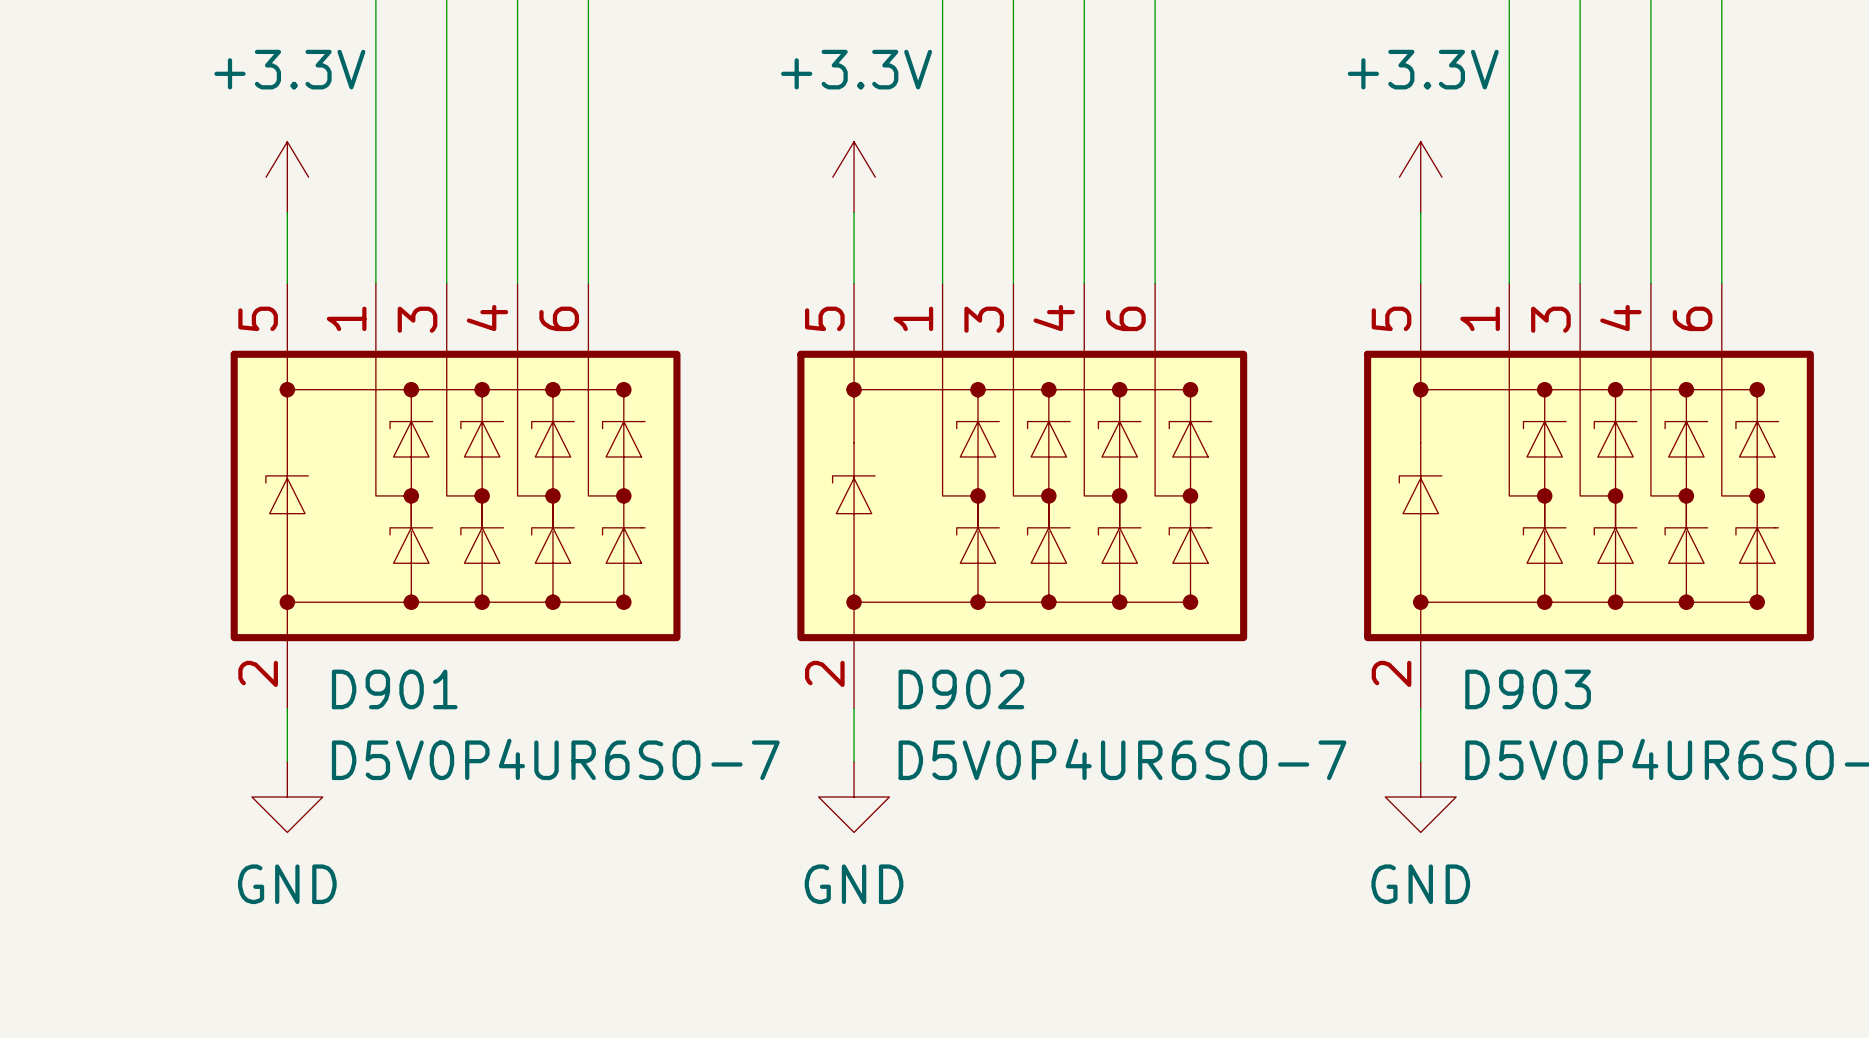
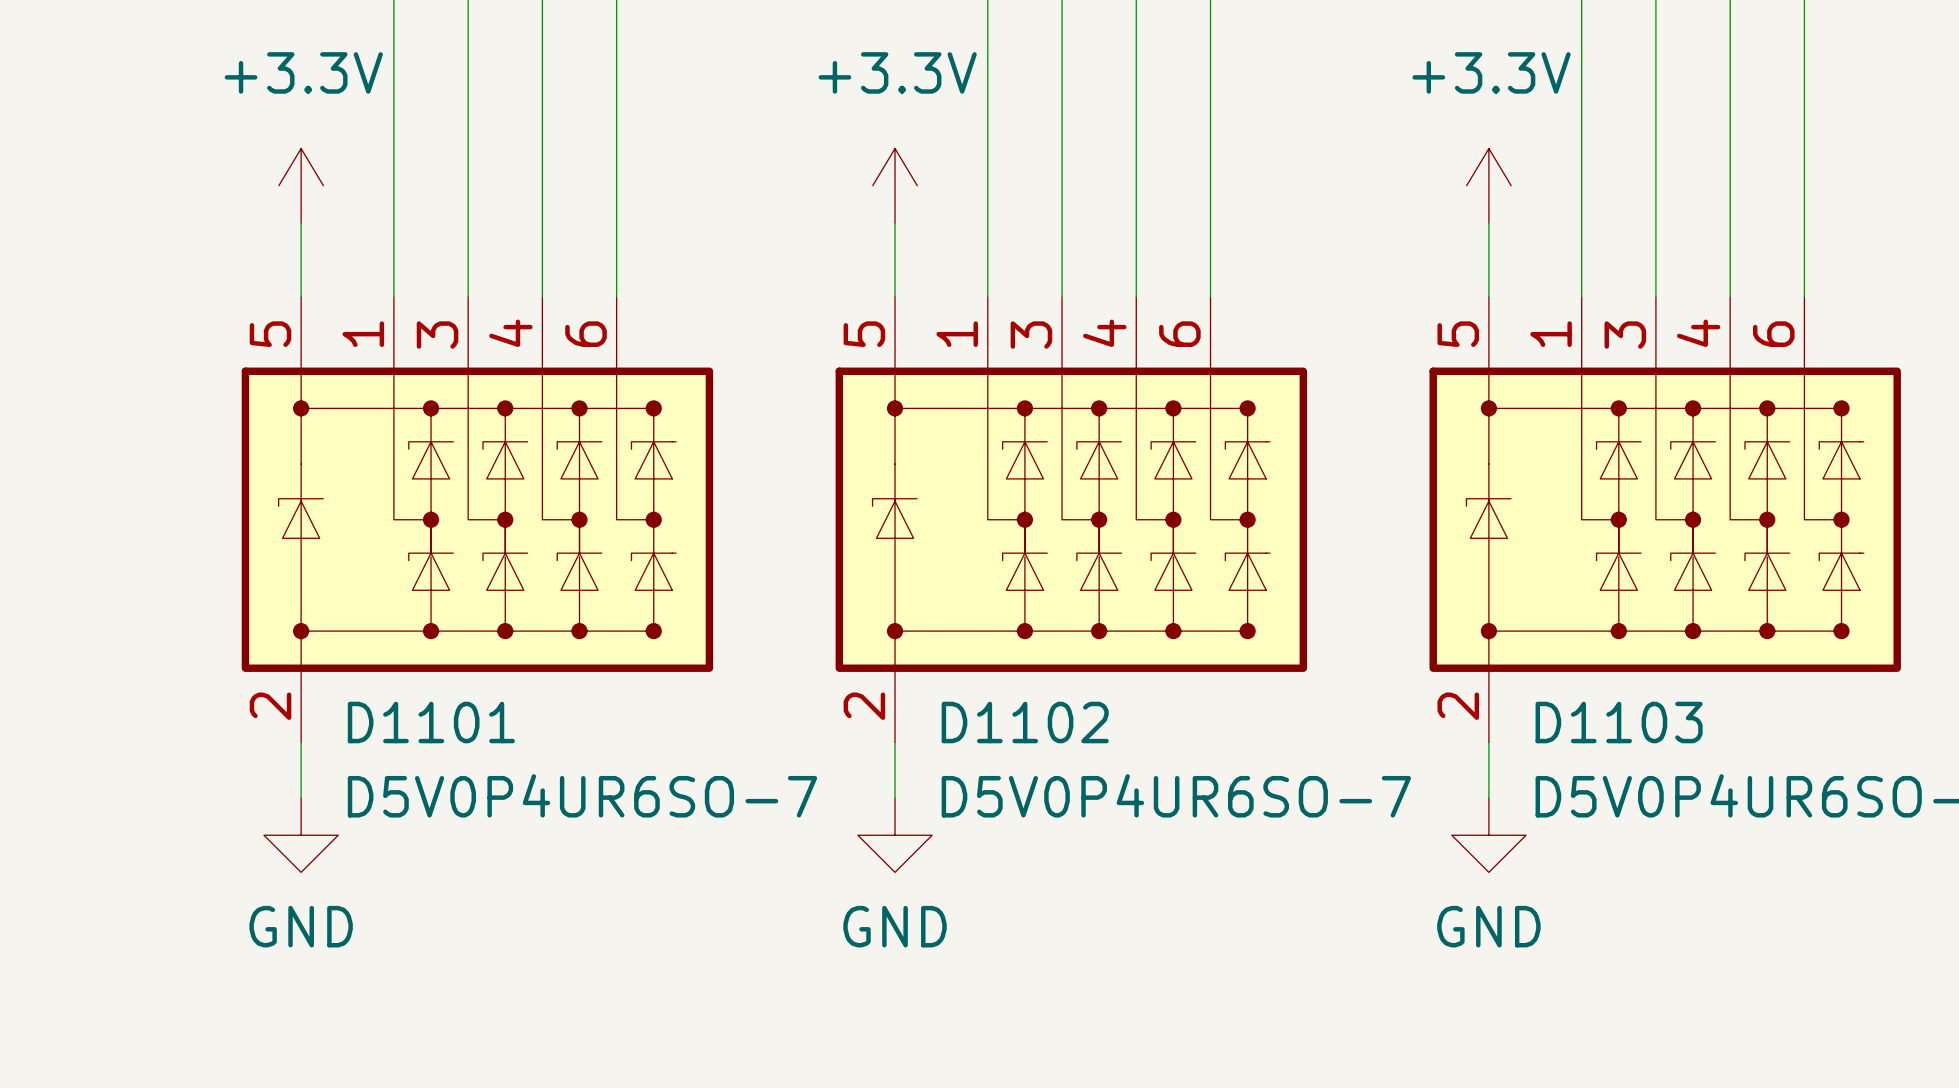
D901 name: D901 (394, 689) -> D1101 (431, 722)
D902 name: D902 (961, 689) -> D1102 (1025, 722)
D903 name: D903 (1528, 689) -> D1103 (1619, 722)

